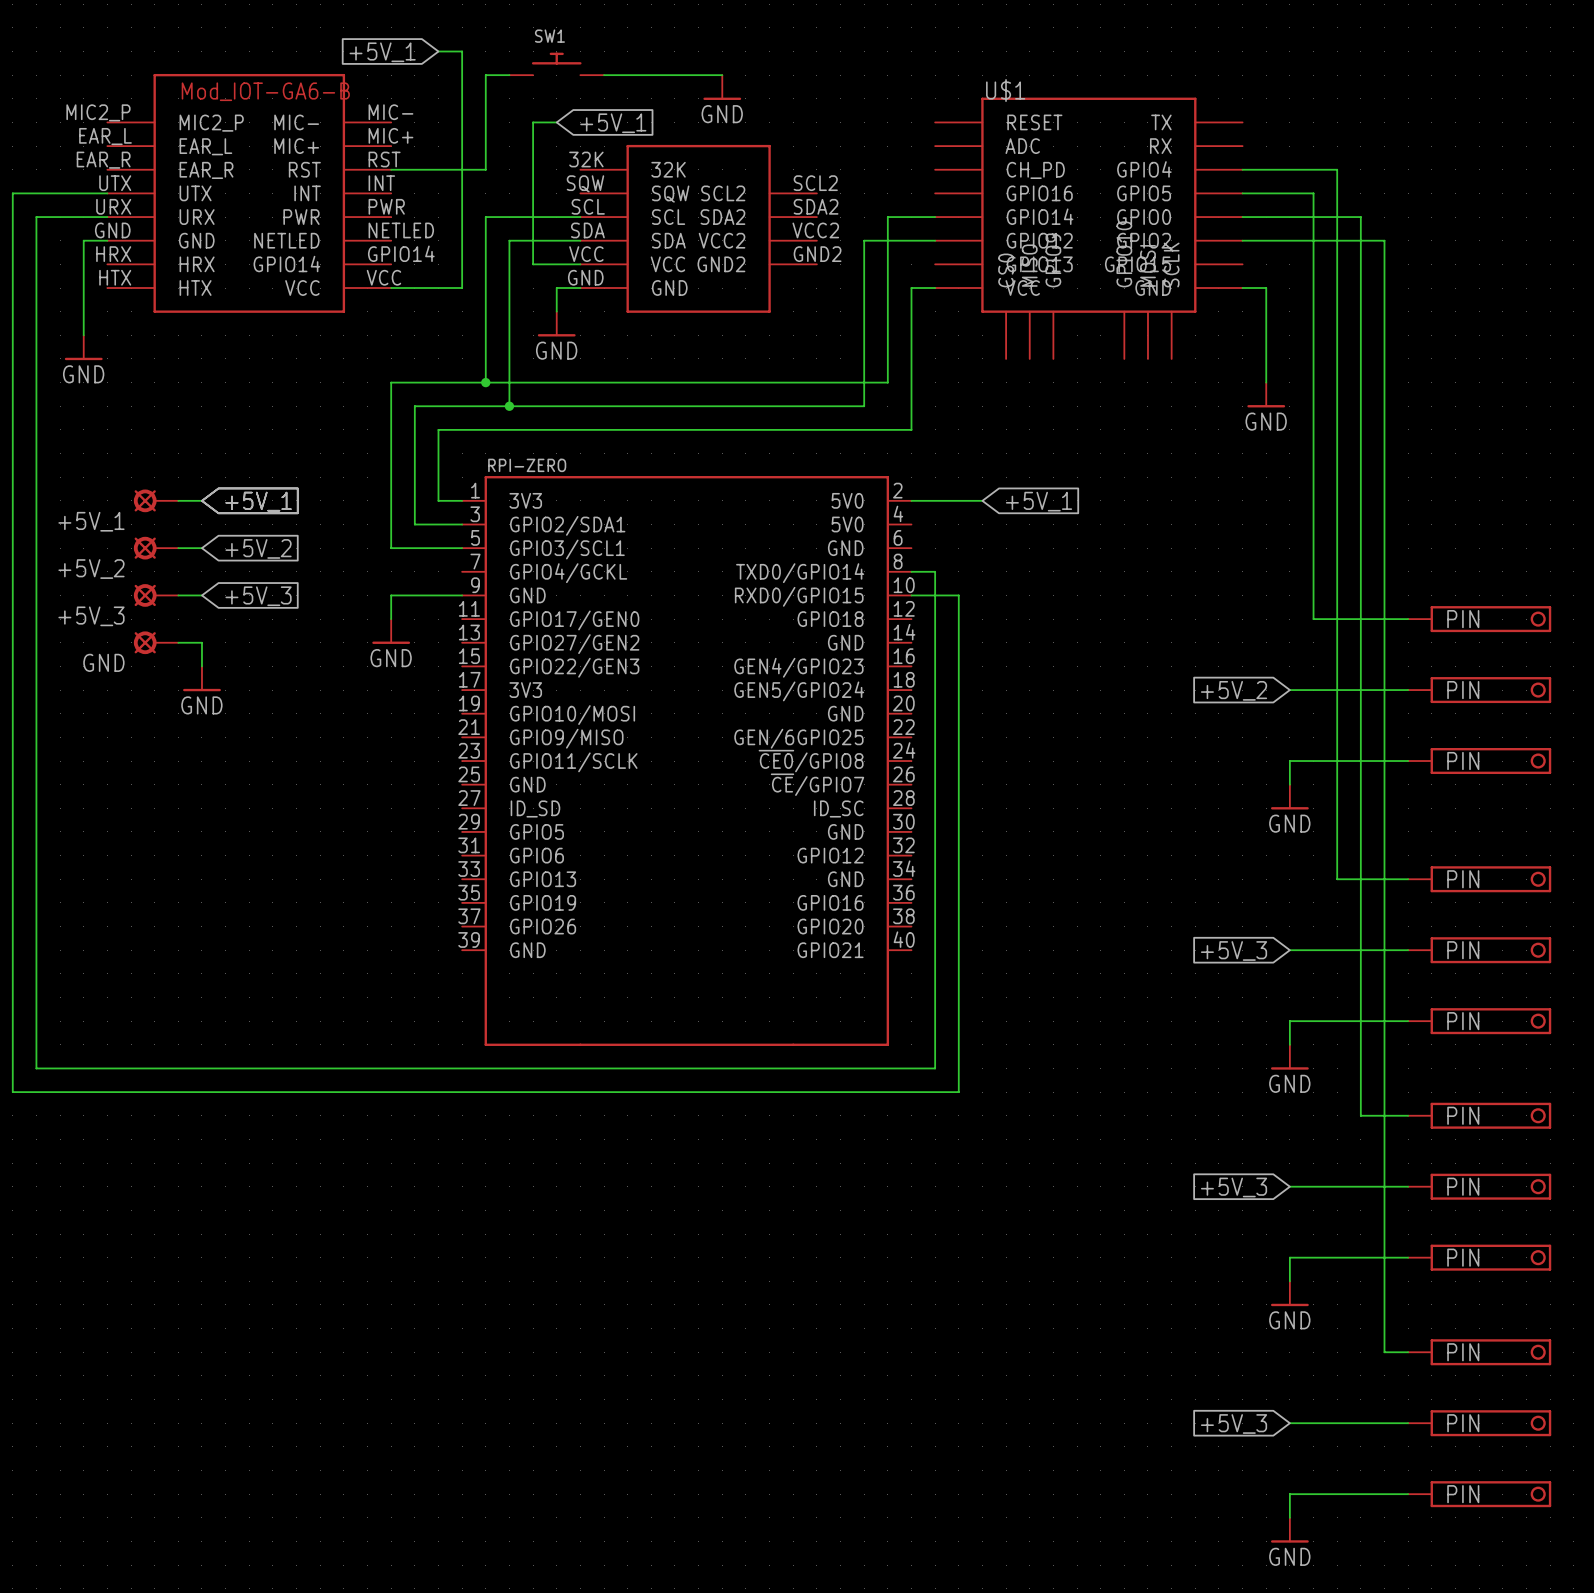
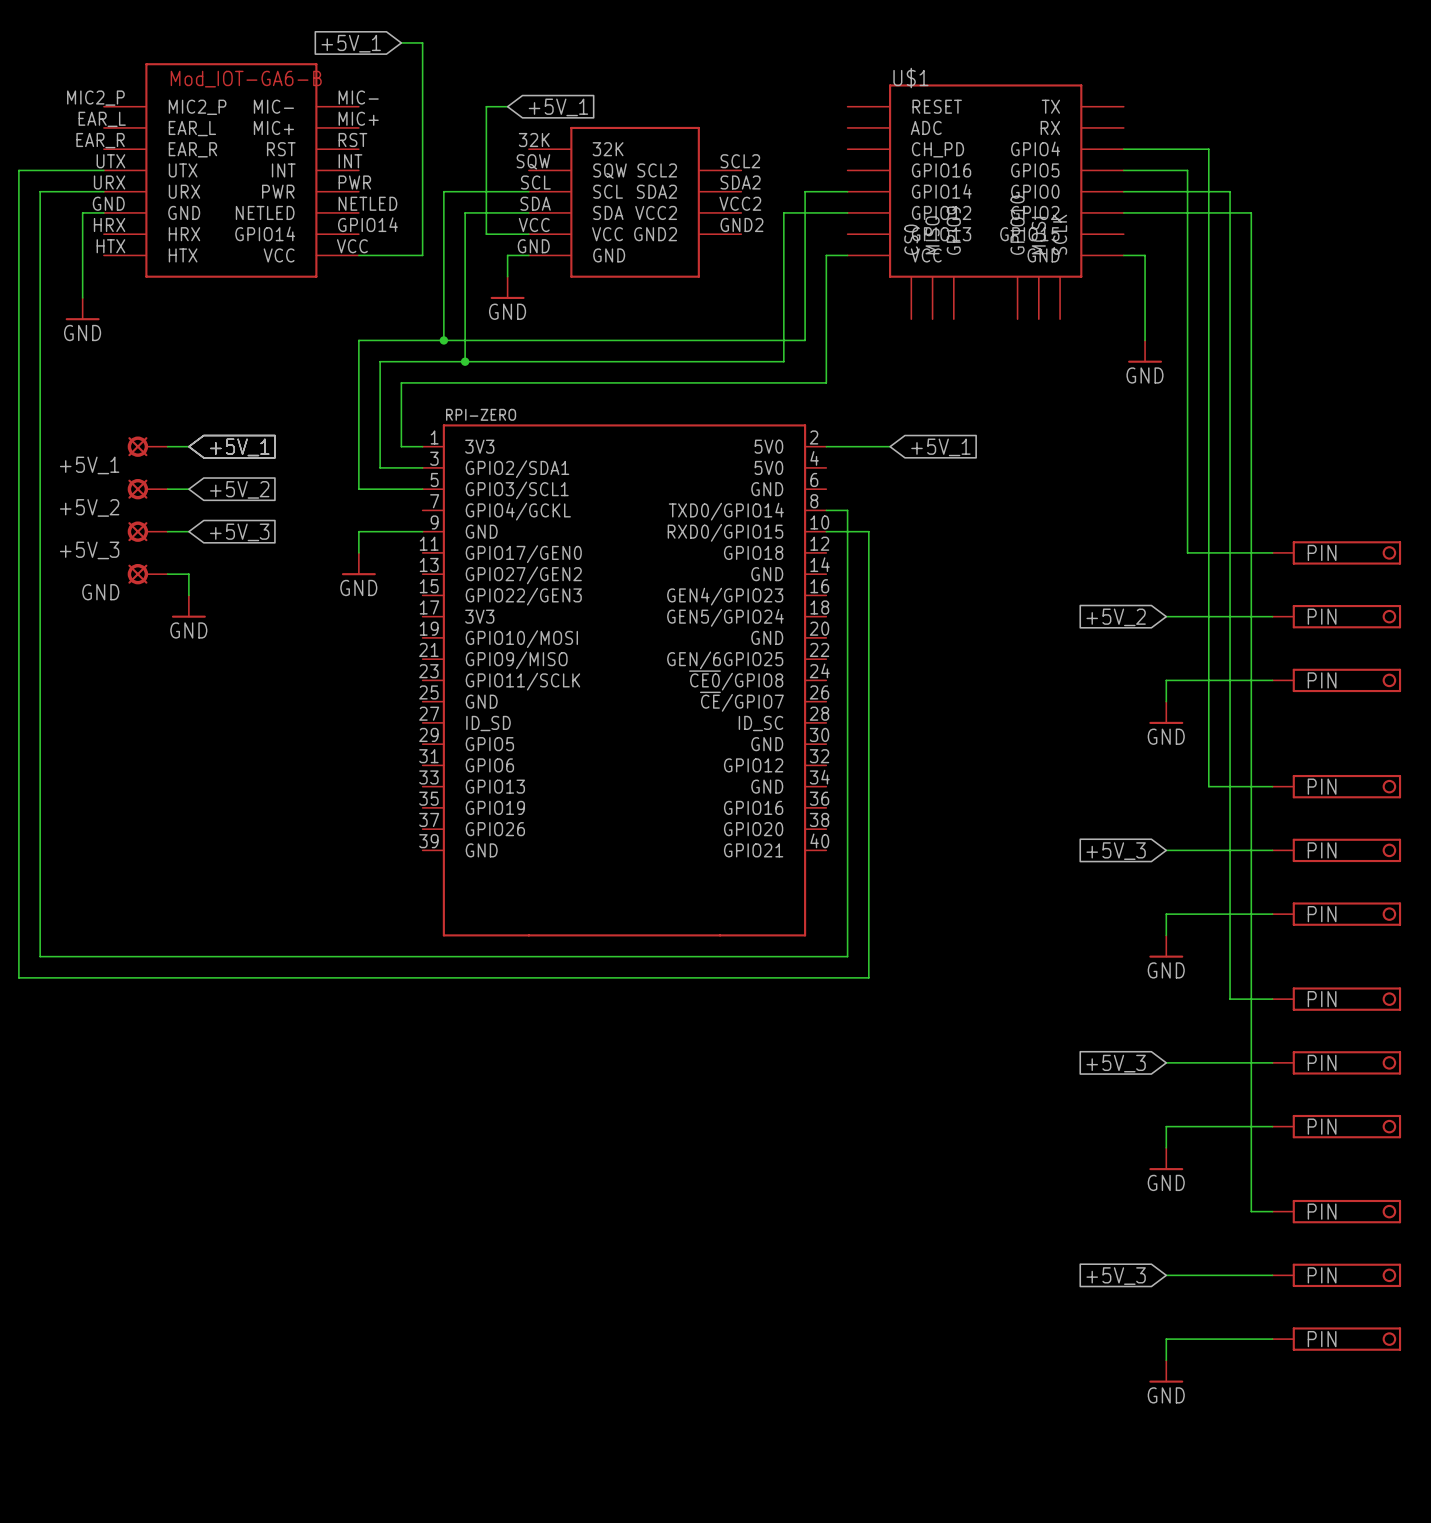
SW1: (556, 63) -> none
wire: (509, 75) (485, 75) (485, 169) (391, 169) -> none
wire: (604, 75) (722, 75) -> none
power symbol: GND (722, 87) -> none

